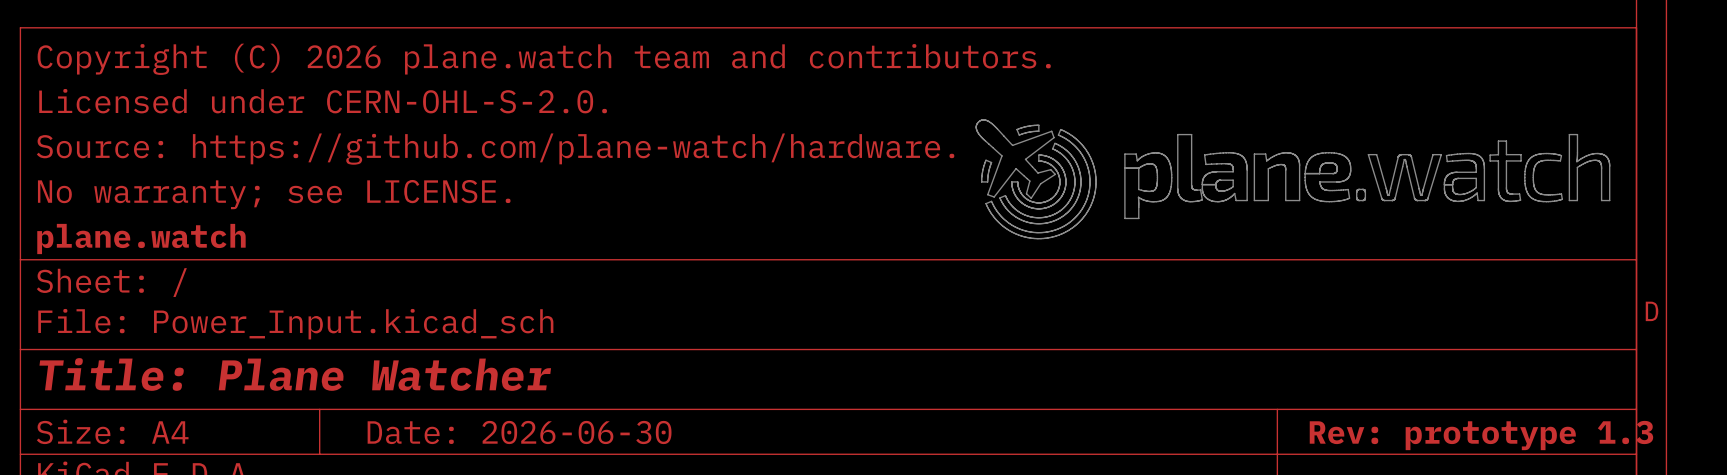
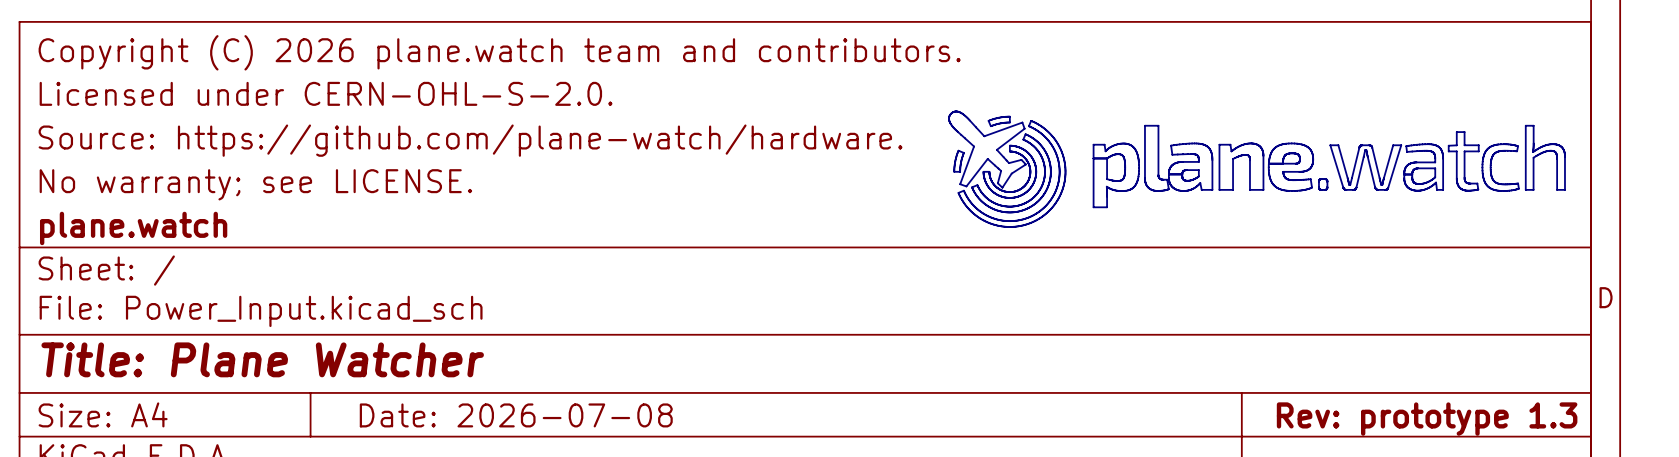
title block: Date: 2026-06-30 (519, 432) -> Date: 2026-07-08 (516, 415)

